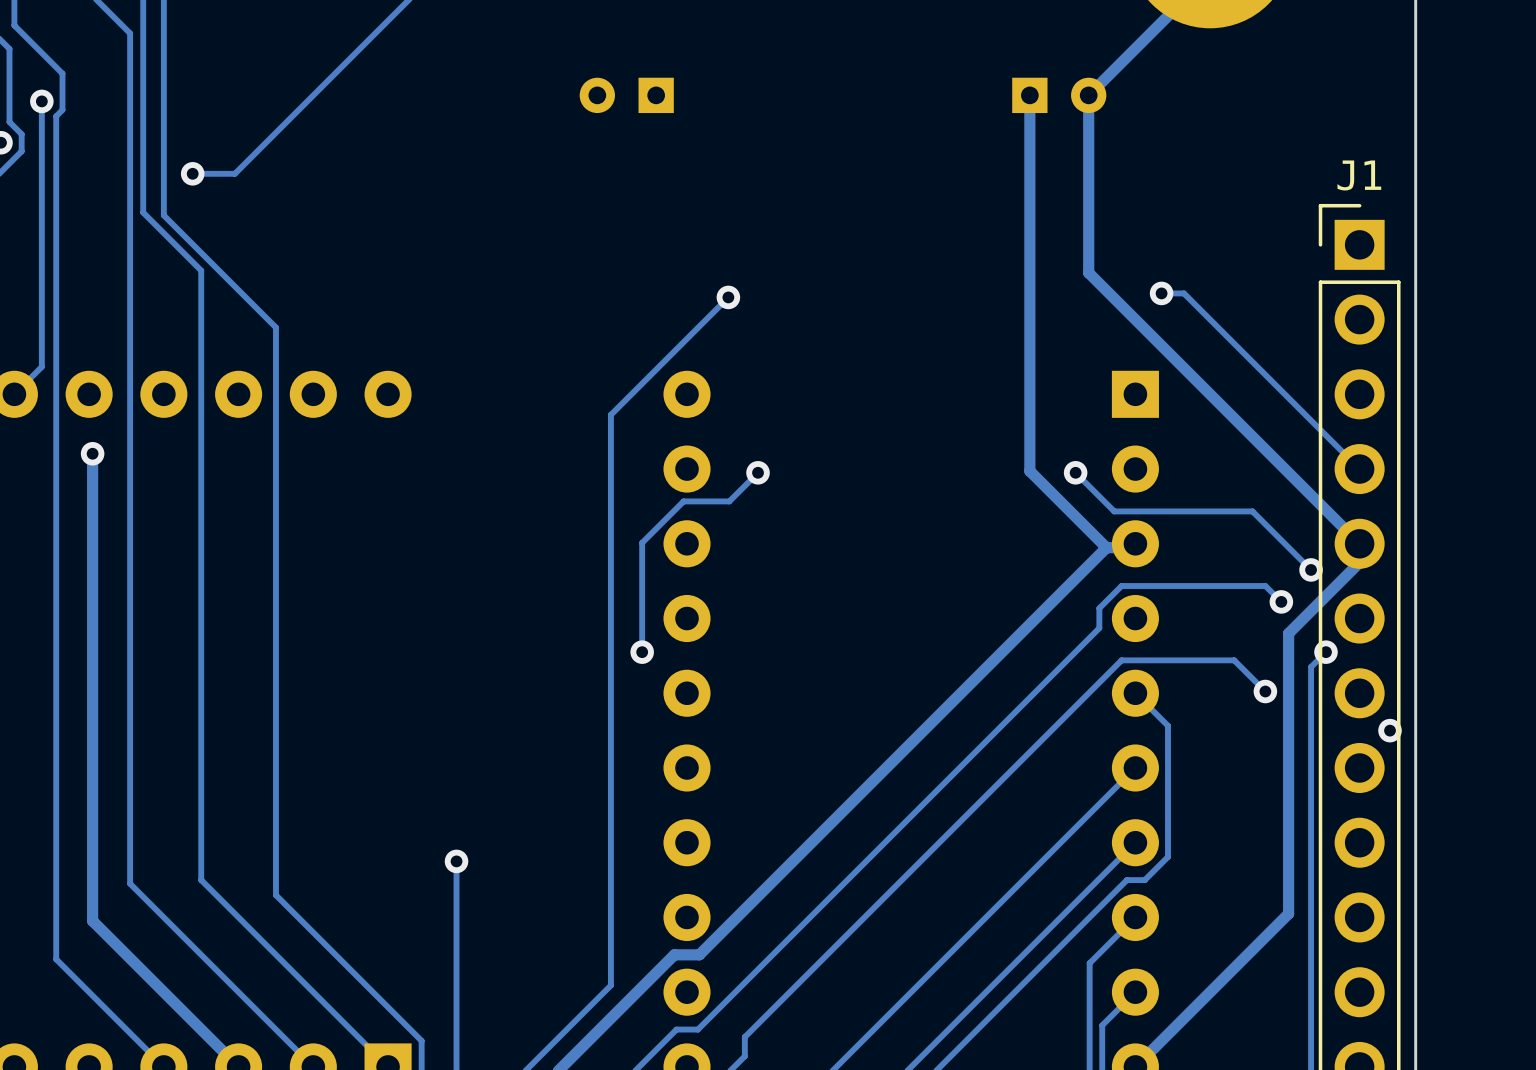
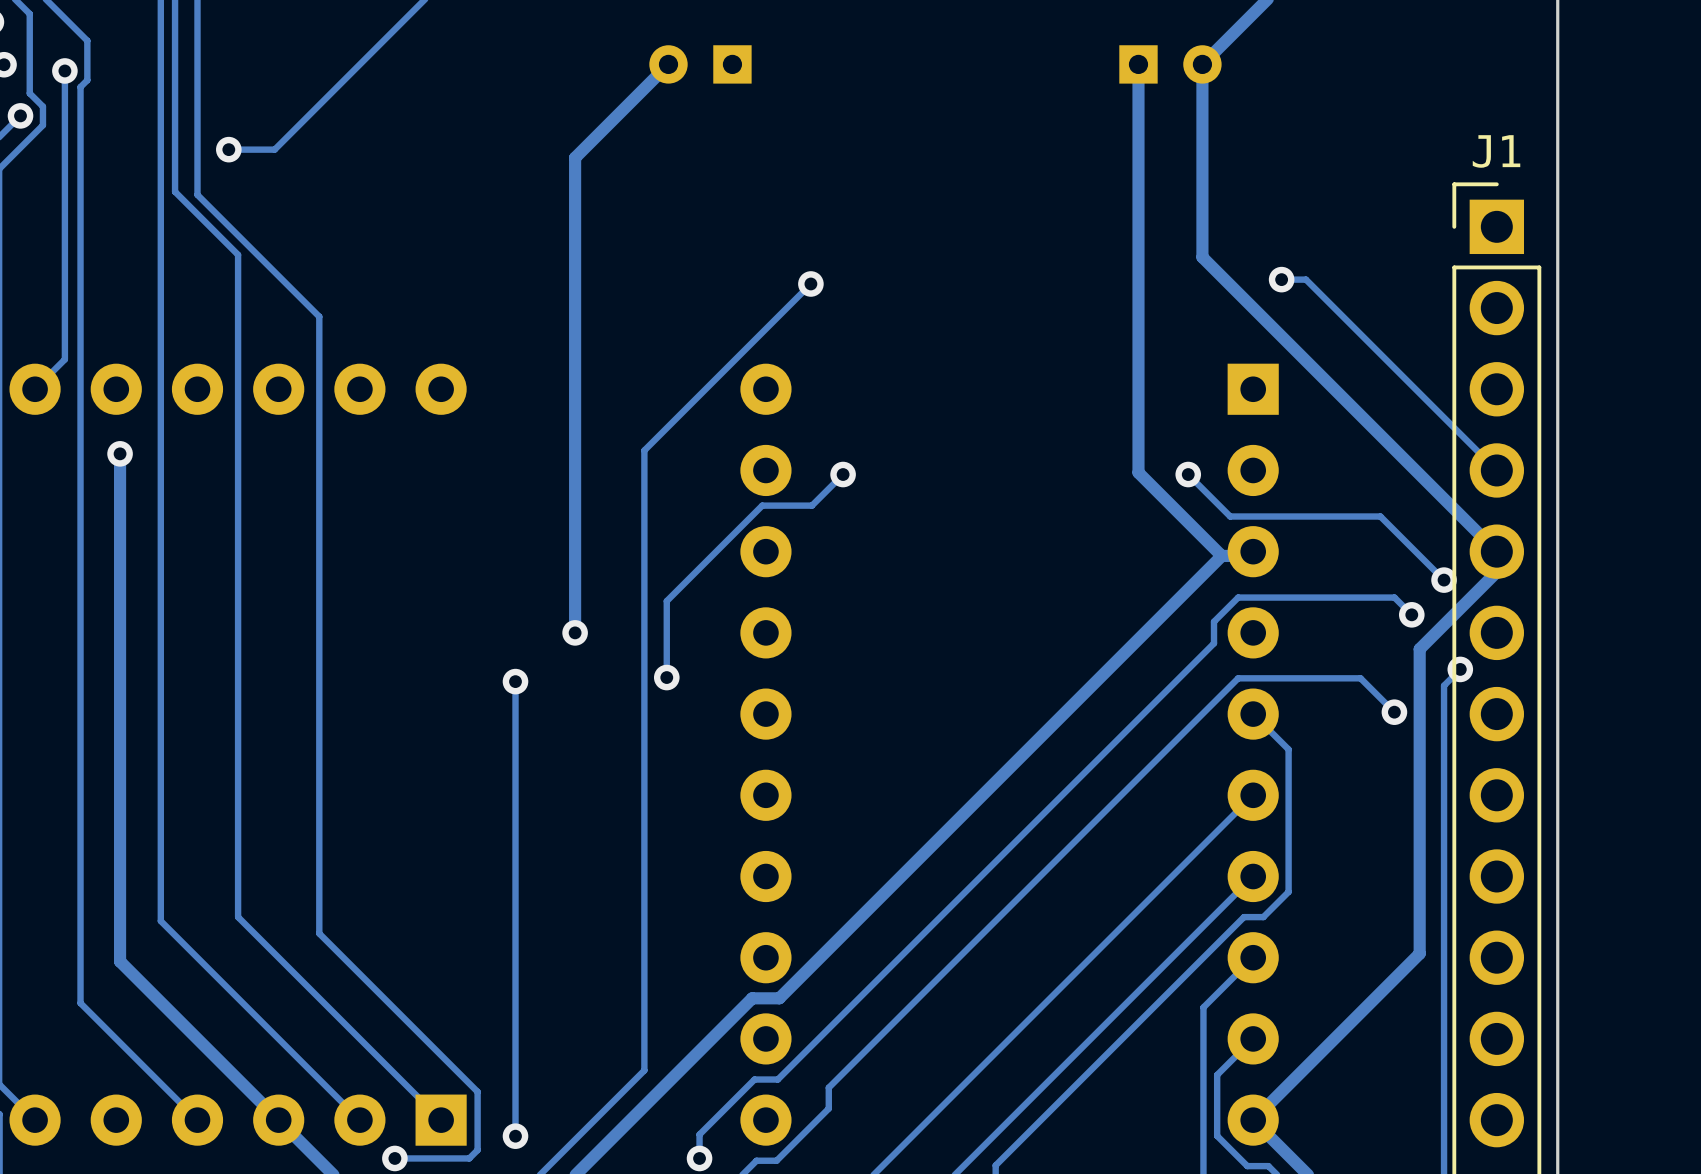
track: none -> (668, 64) (575, 157) (575, 632)
track: (610, 414) (610, 985) (575, 1021) -> (683, 411) (644, 450) (644, 1070)
track: (642, 542) (642, 652) -> (717, 550) (666, 601) (666, 677)
via: none -> (575, 632)
via position: (642, 652) -> (666, 677)
track: none -> (515, 681) (515, 896)
via: none -> (515, 681)
via: (1390, 730) -> none
via: (456, 861) -> none

